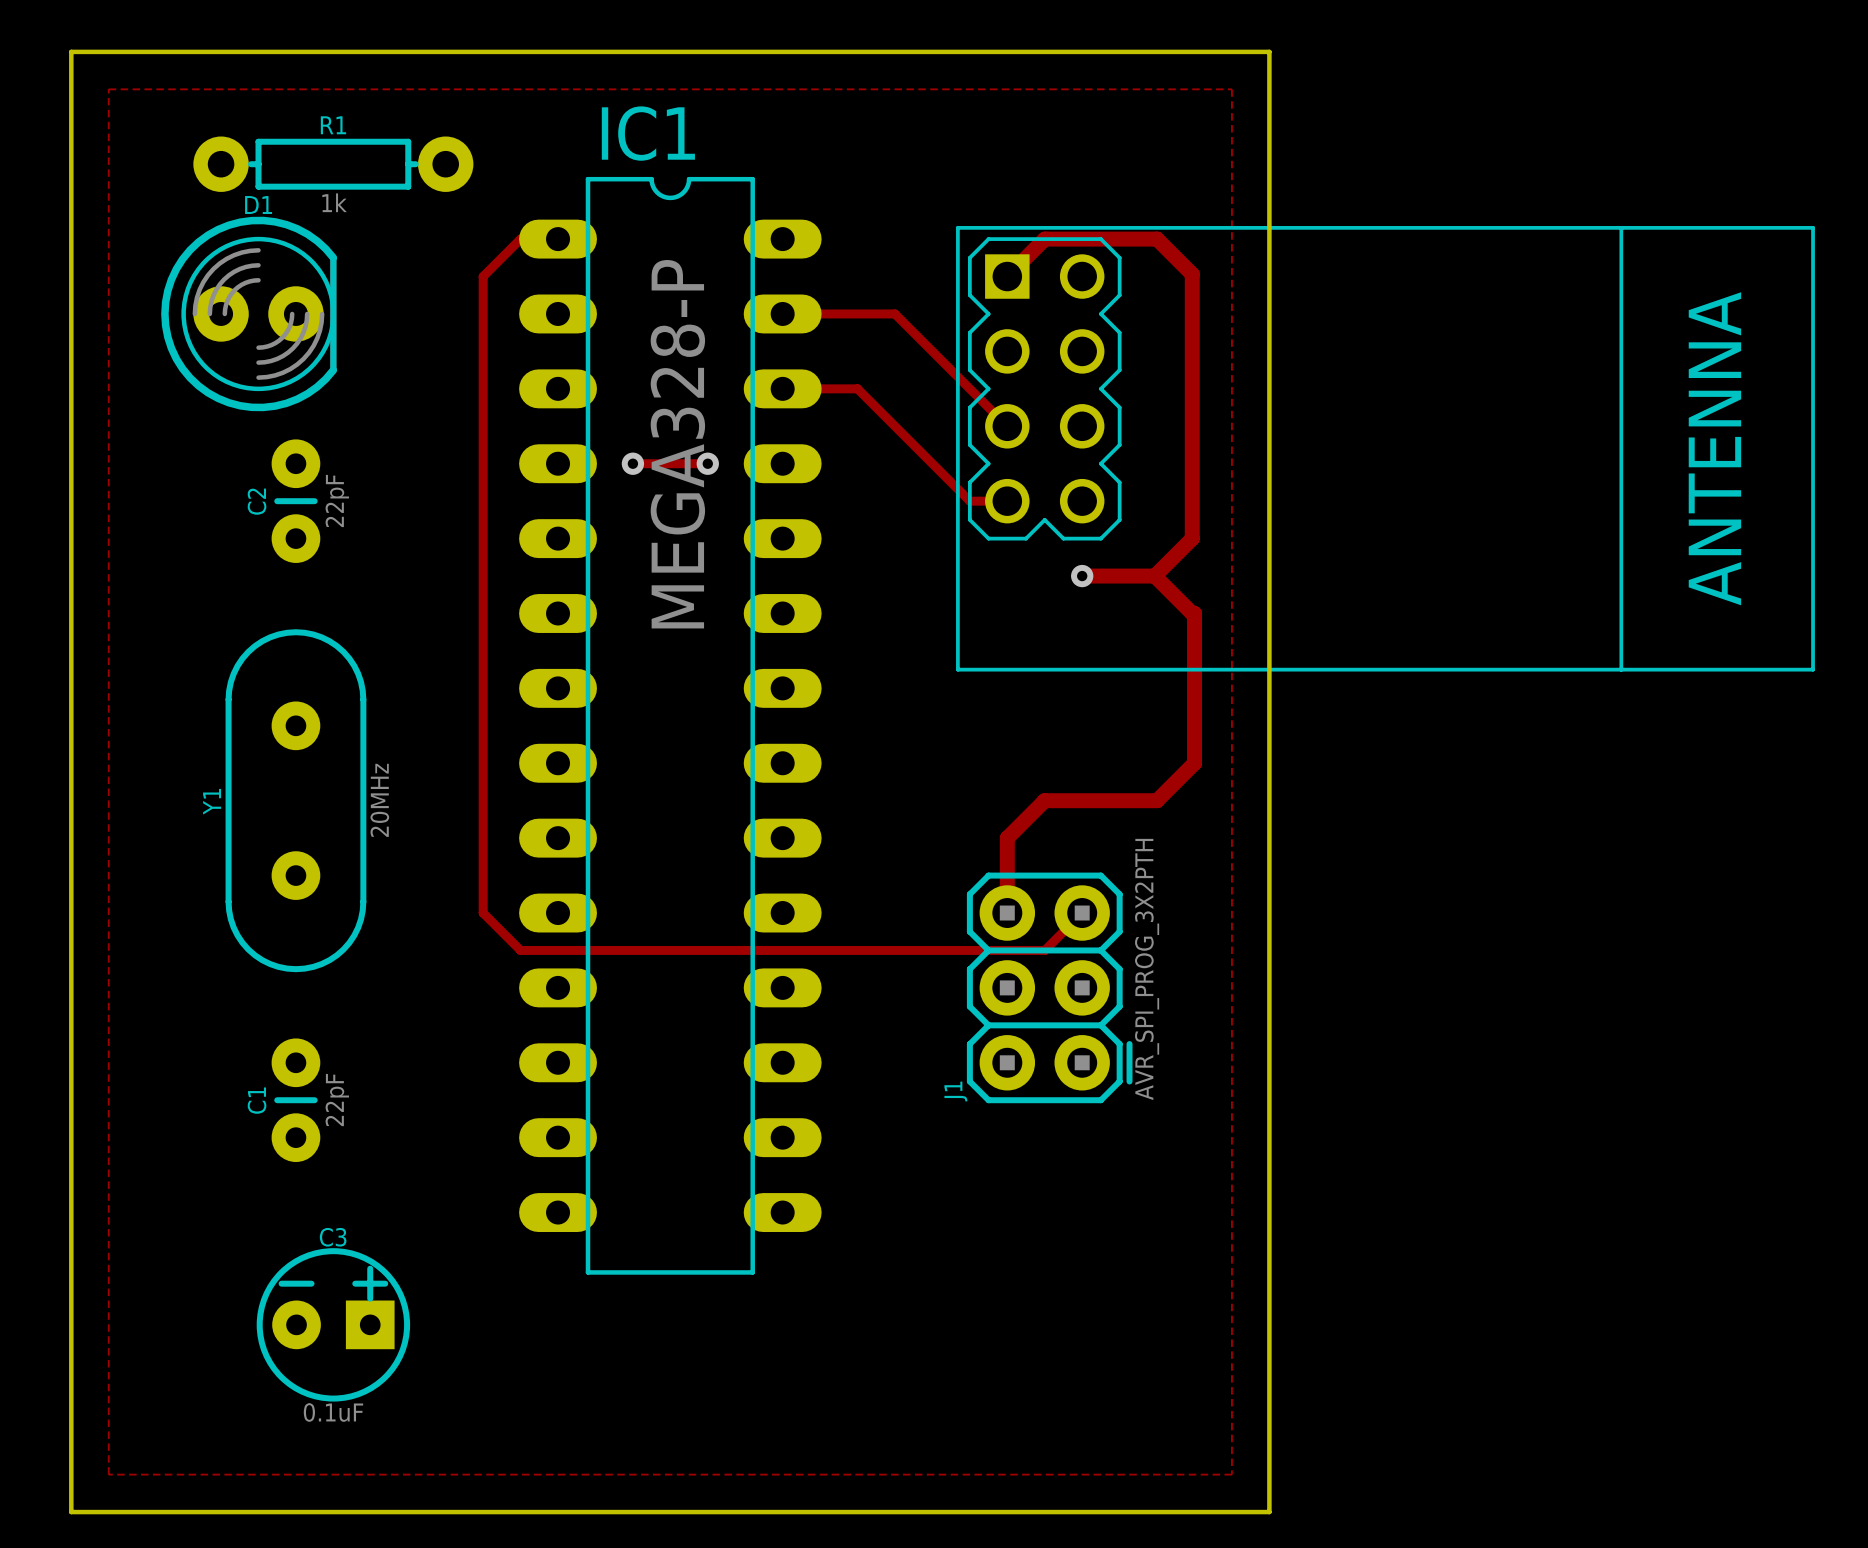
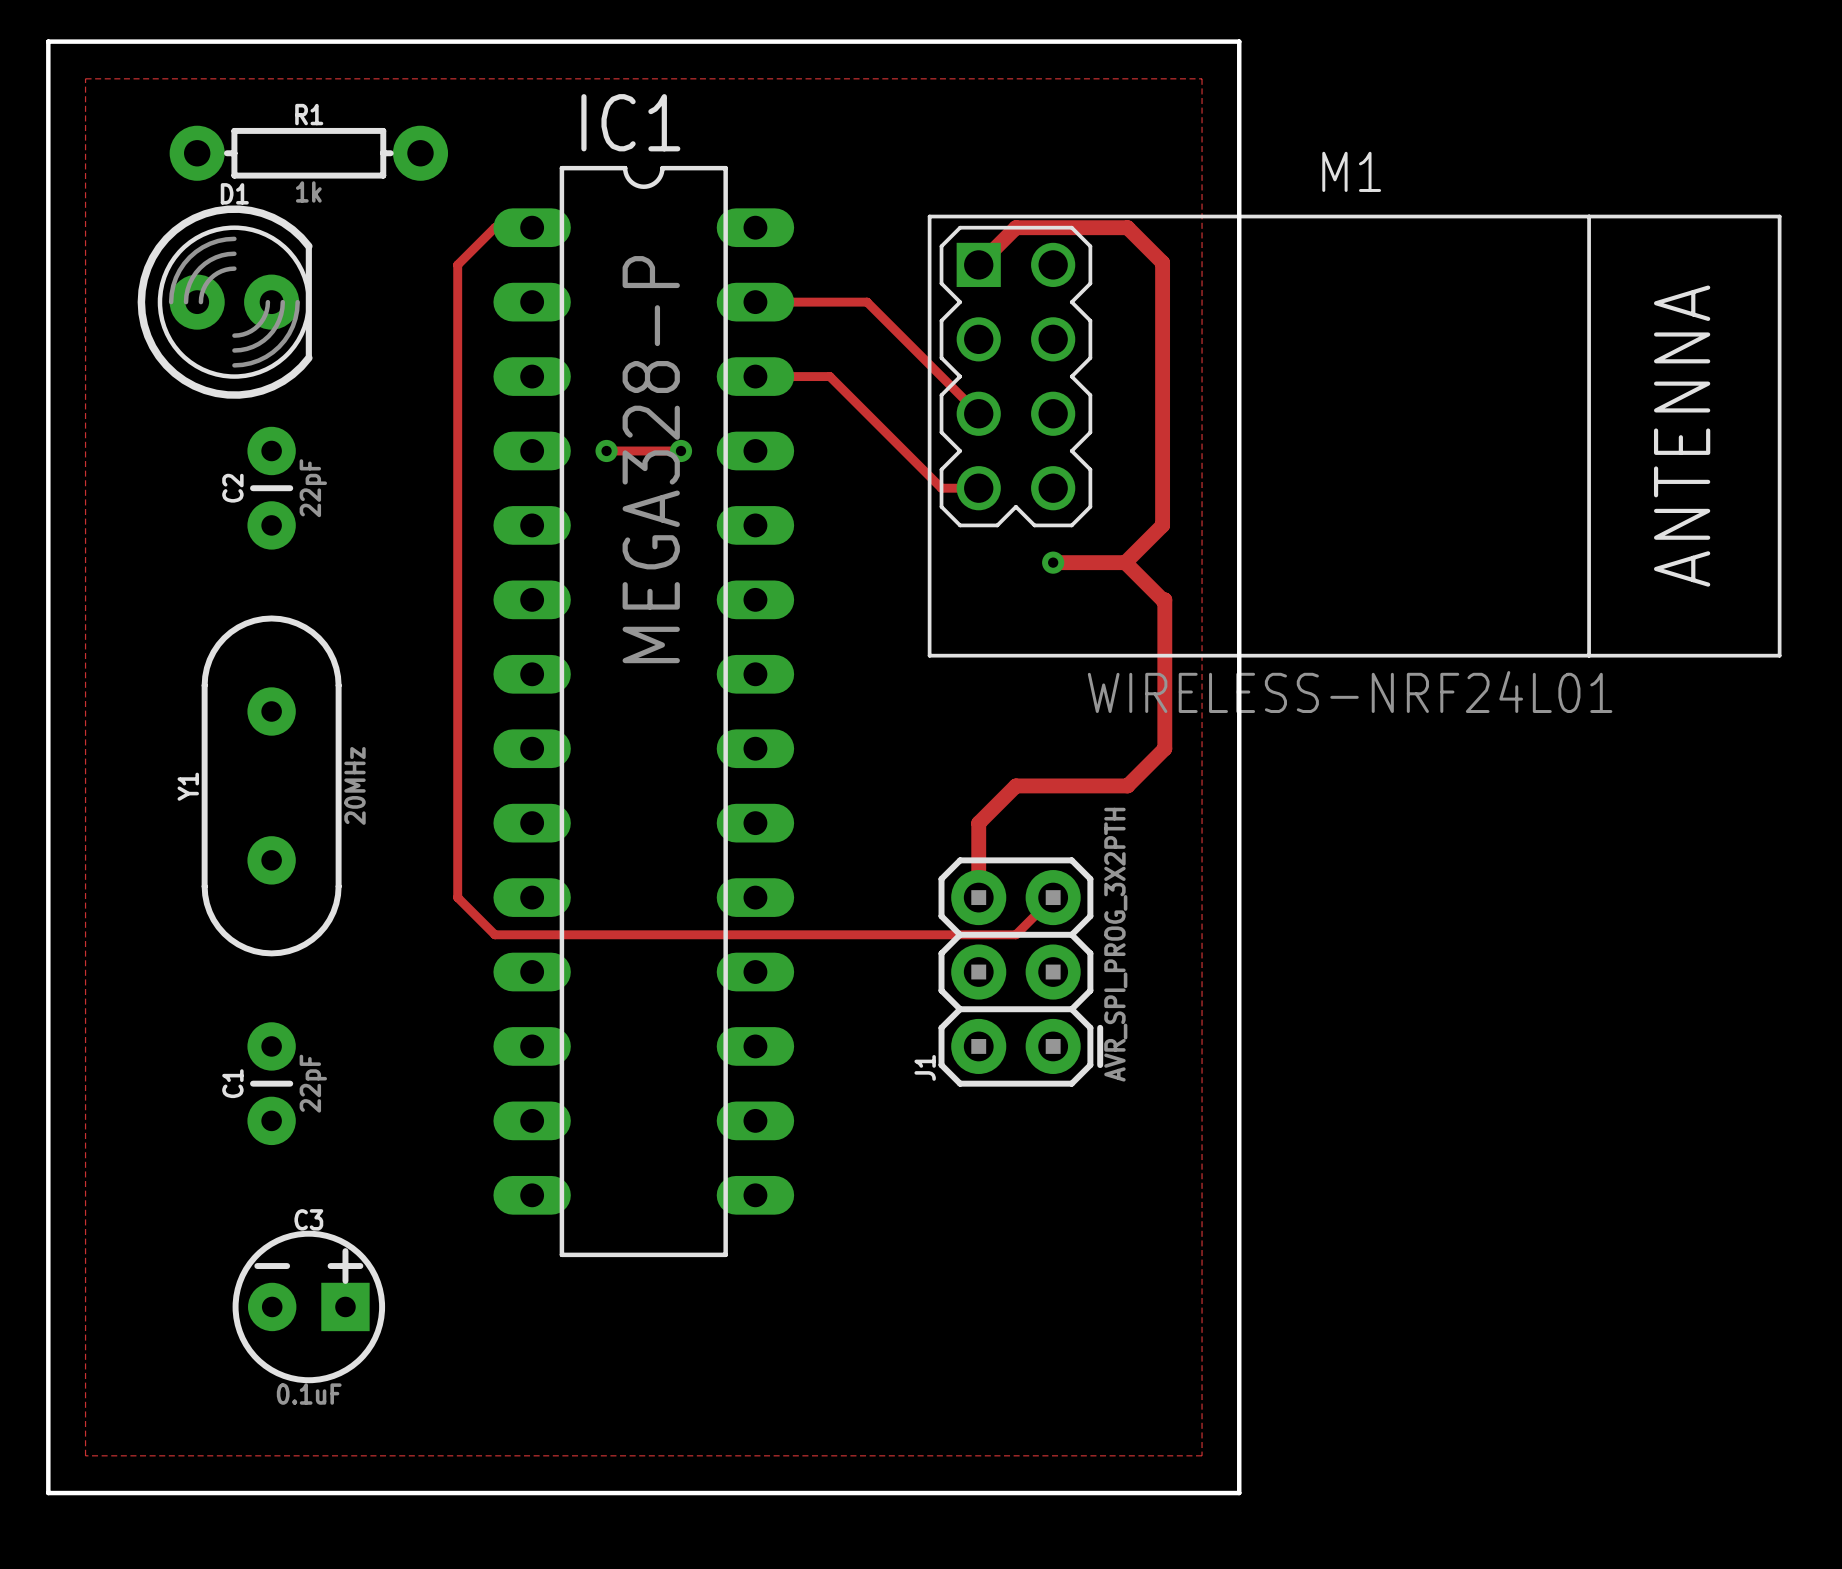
M1 name: none -> M1 (1351, 171)
M1 value: none -> WIRELESS-NRF24L01 (1350, 692)

